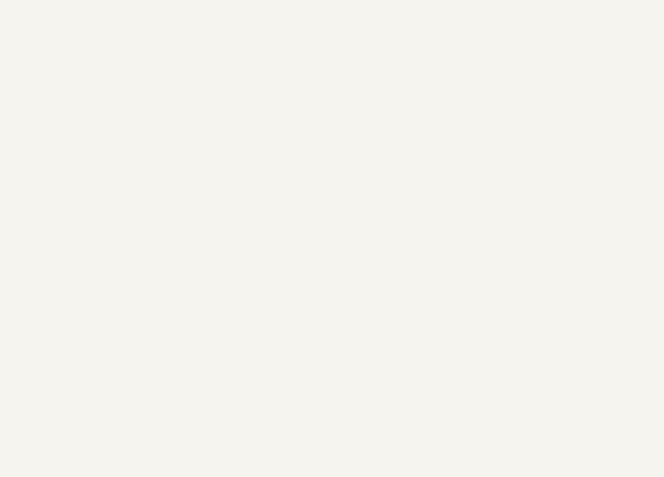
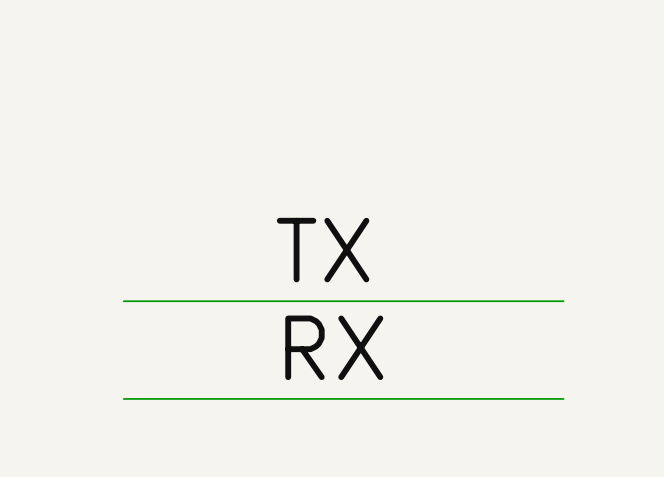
label: none -> TX (323, 250)
wire: none -> (123, 301) (563, 301)
label: none -> RX (334, 347)
wire: none -> (123, 398) (563, 398)

